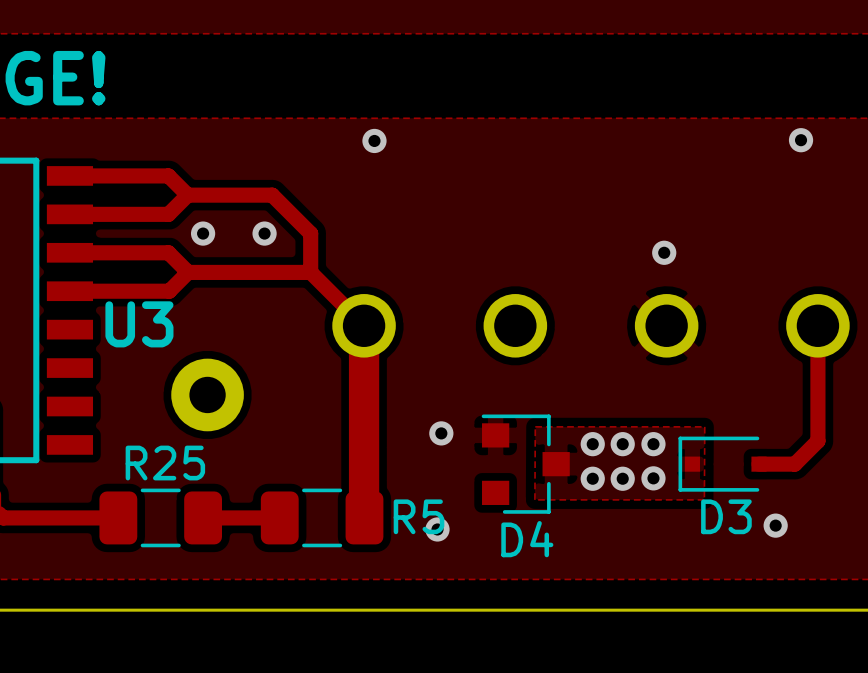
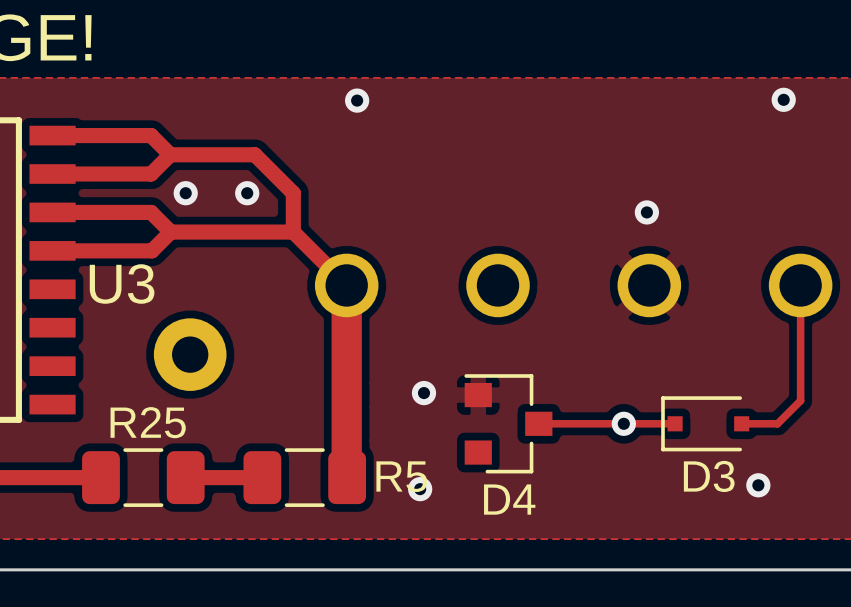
track width: thick (817, 325) (817, 441) (794, 464) (758, 464) -> thin (800, 285) (800, 400) (777, 423) (741, 423)
zone outline: (535, 426) (534, 499) (704, 499) (704, 426) (535, 426) -> none
via: (592, 444) -> none
via: (622, 444) -> none
via: (653, 444) -> none
track: none -> (538, 423) (675, 423)
via: none -> (623, 423)
via: (592, 478) -> none
via: (622, 478) -> none
via: (653, 478) -> none

